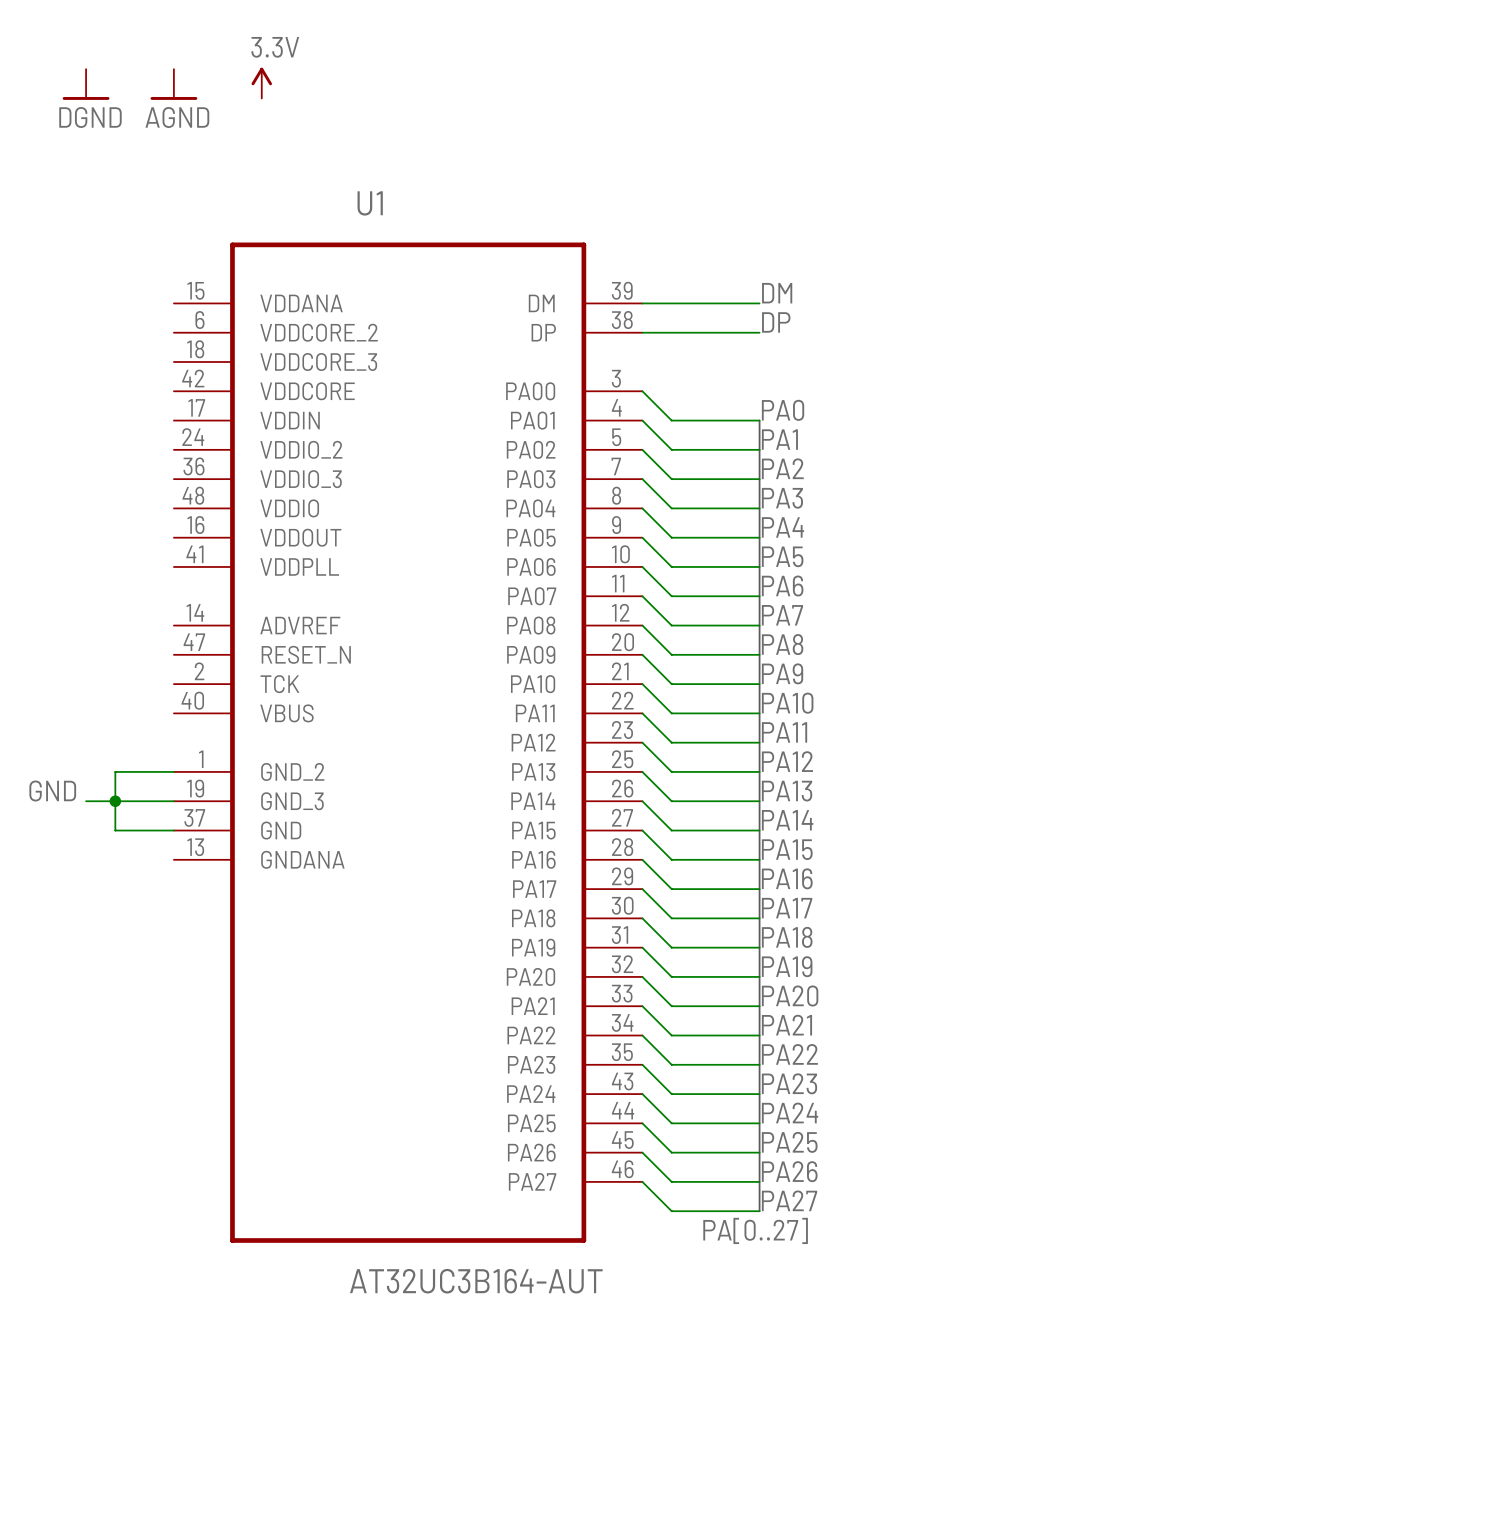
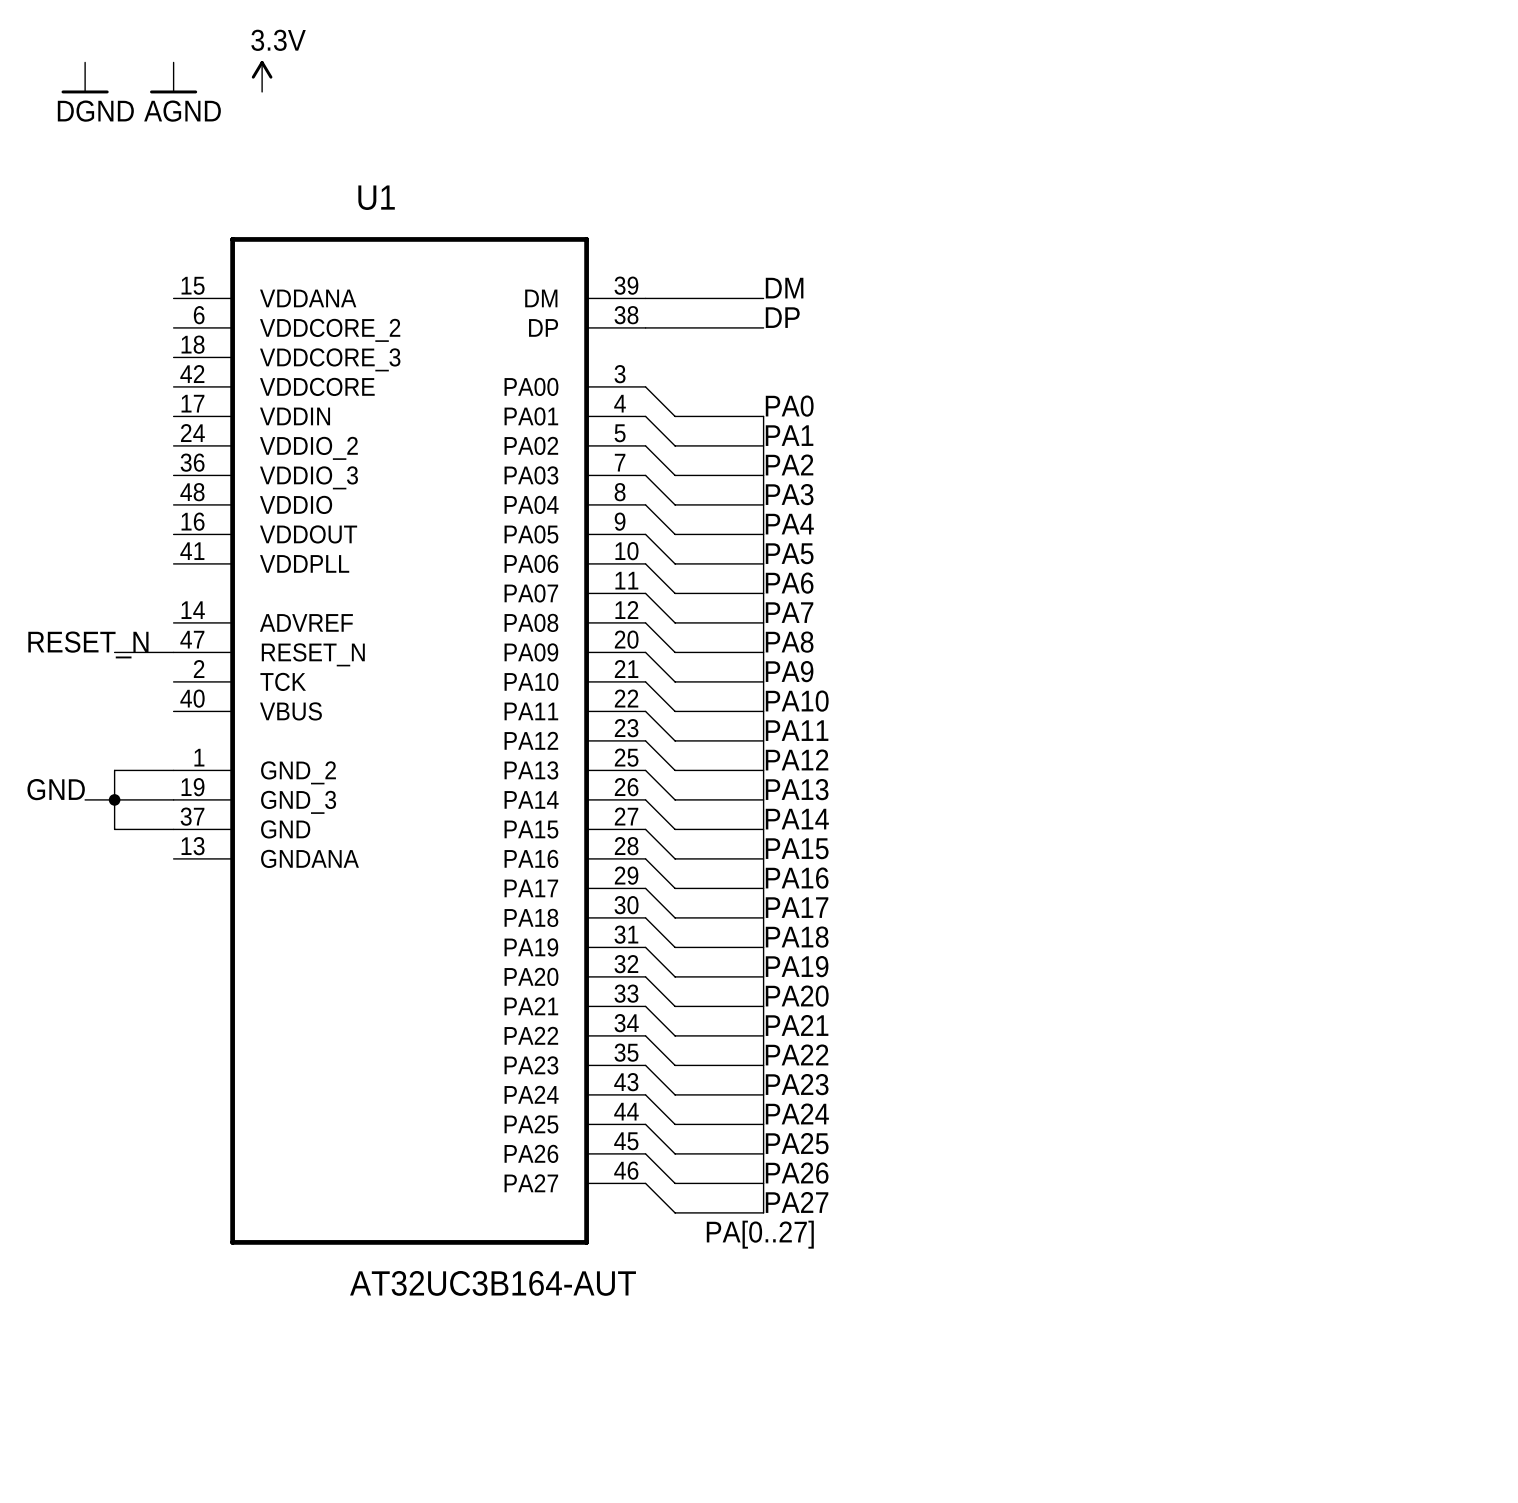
label: none -> RESET_N (88, 644)
wire: none -> (114, 652) (173, 652)

